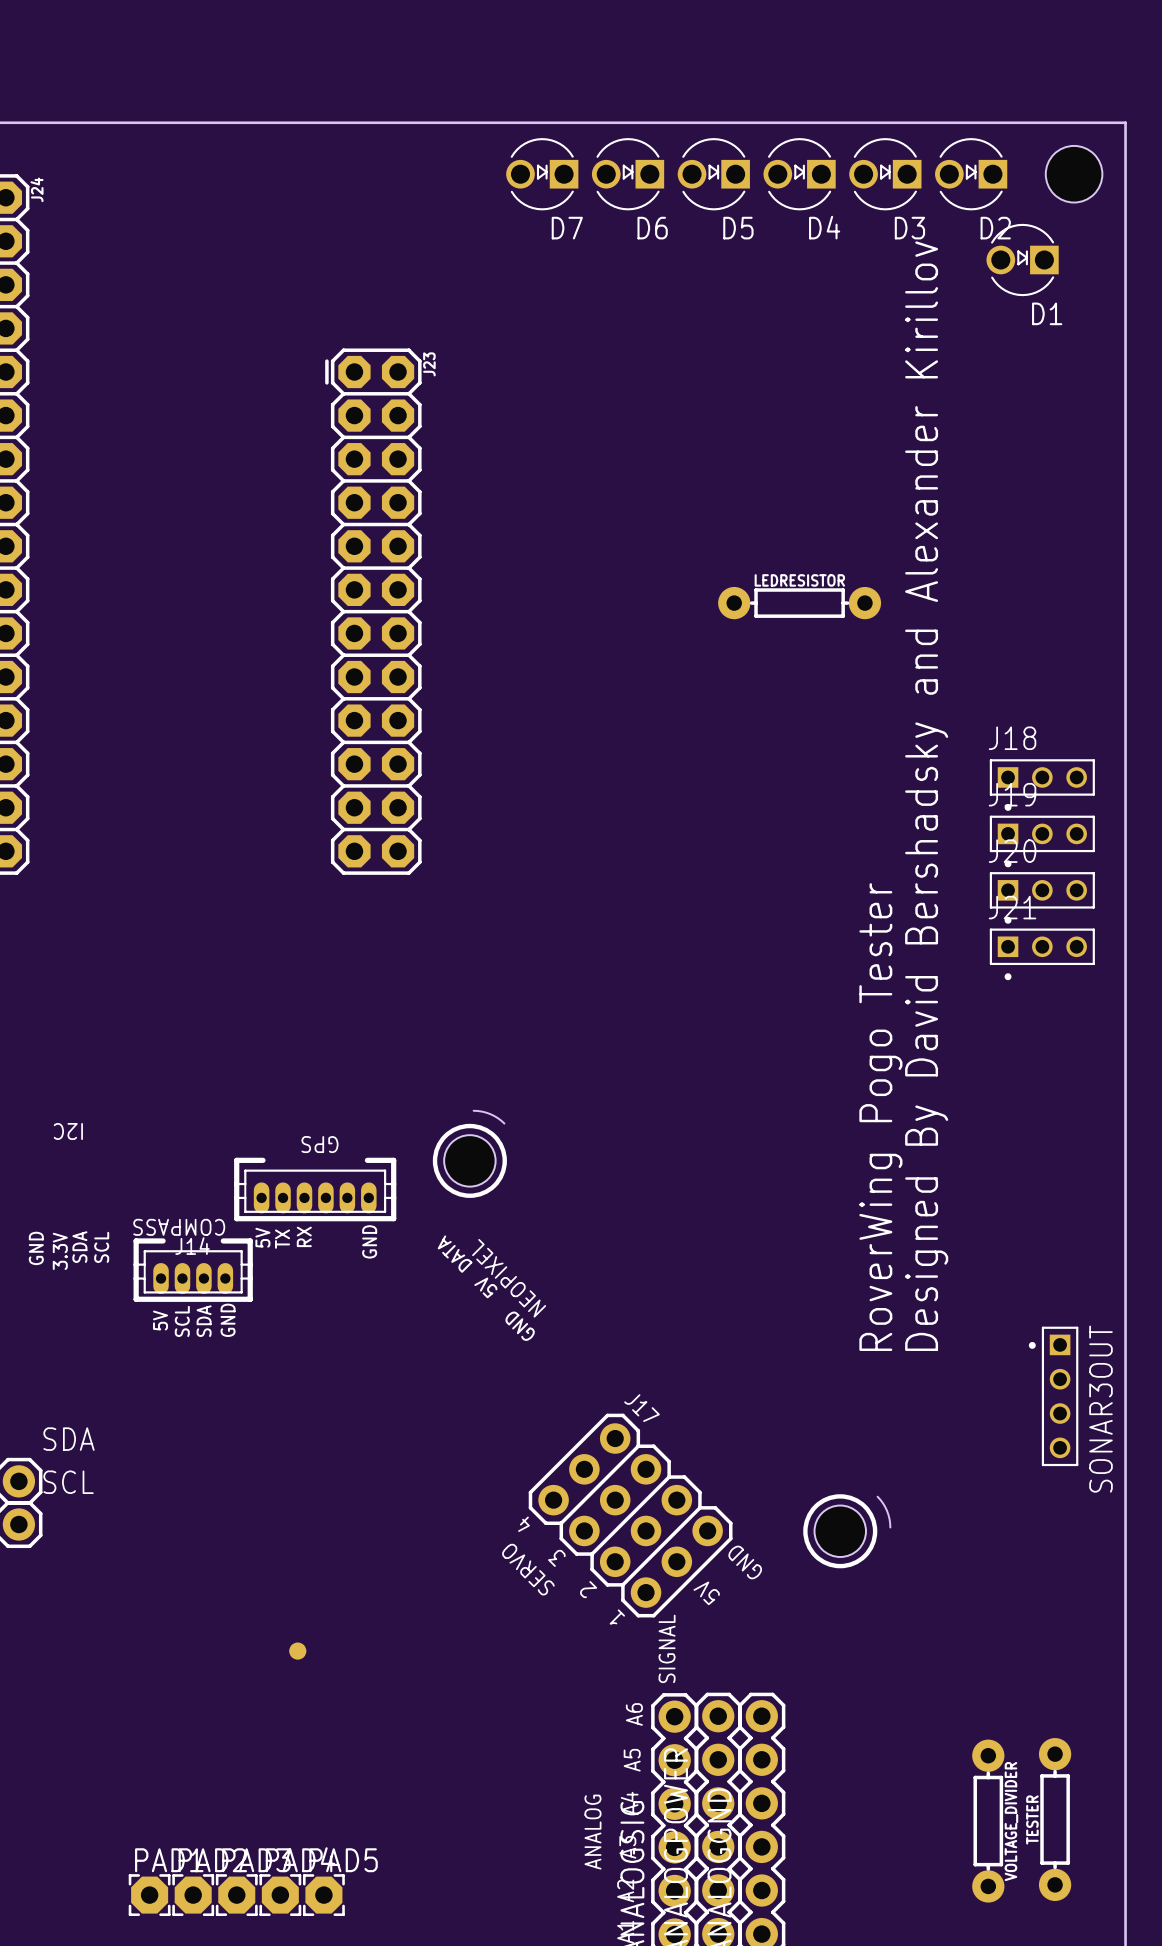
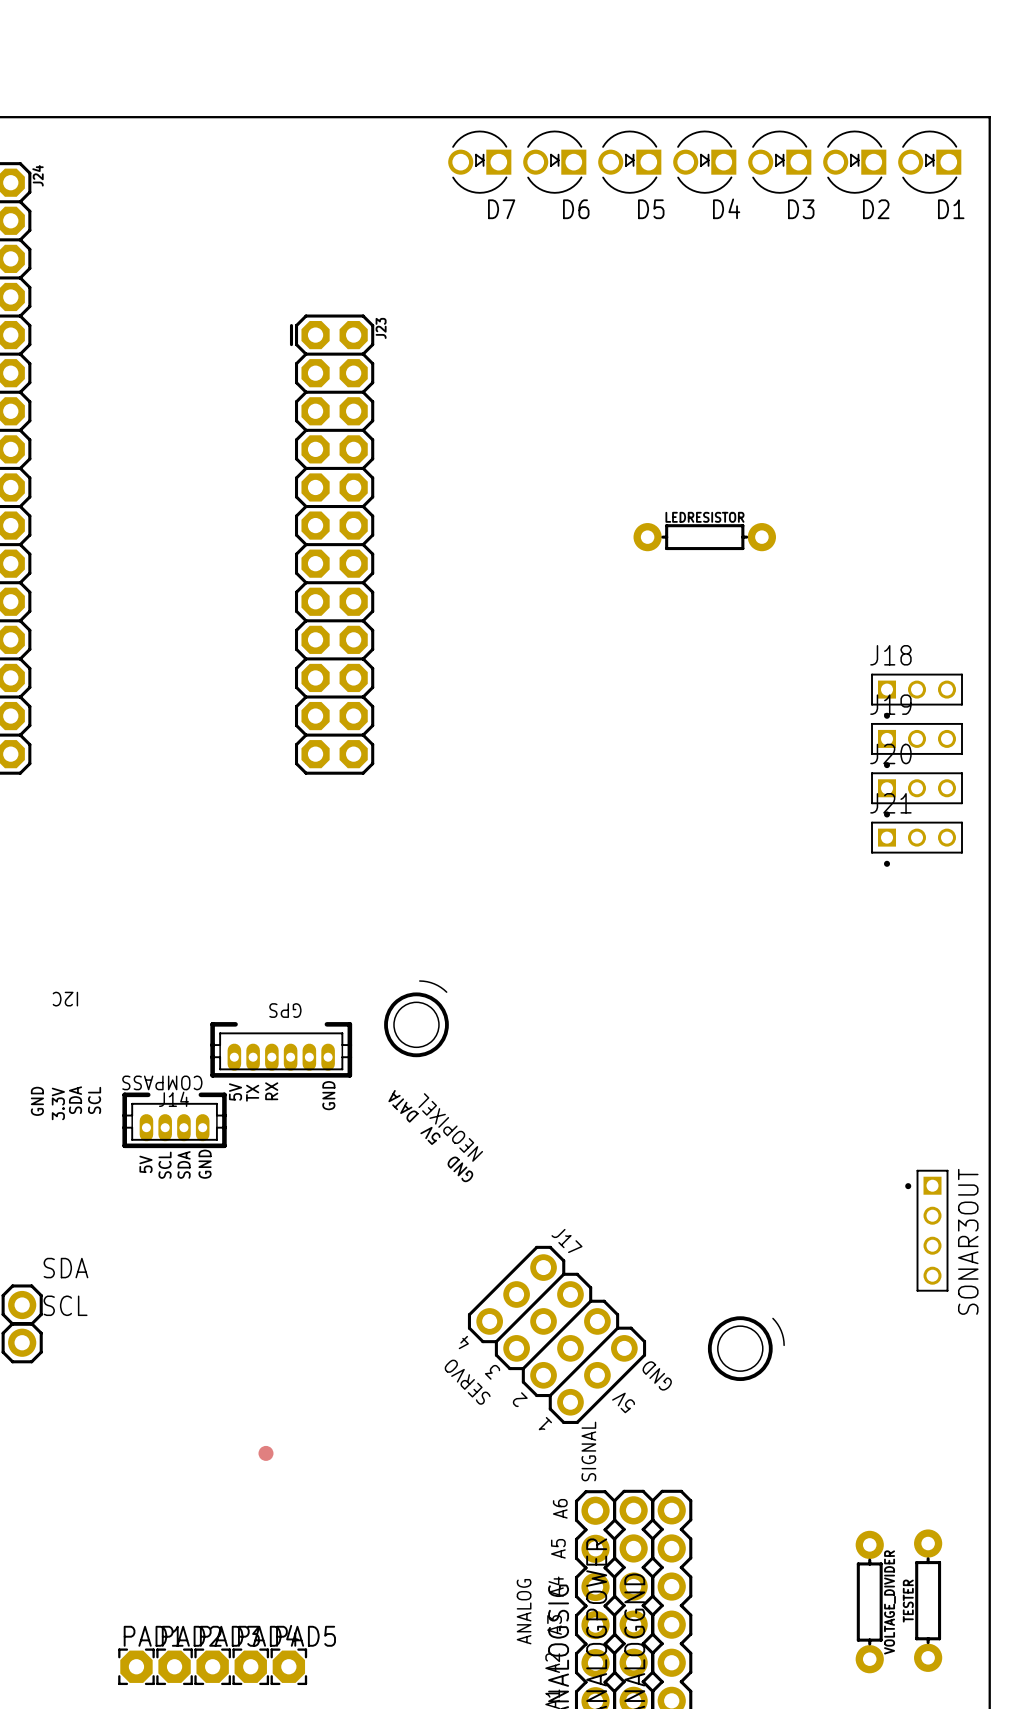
hole: (1074, 174) -> none
D1 position: (1022, 260) -> (929, 162)
text: Designed By David Bershadsky and Alexander Kirillov (926, 796) -> none
text: RoverWing Pogo Tester (880, 1117) -> none

